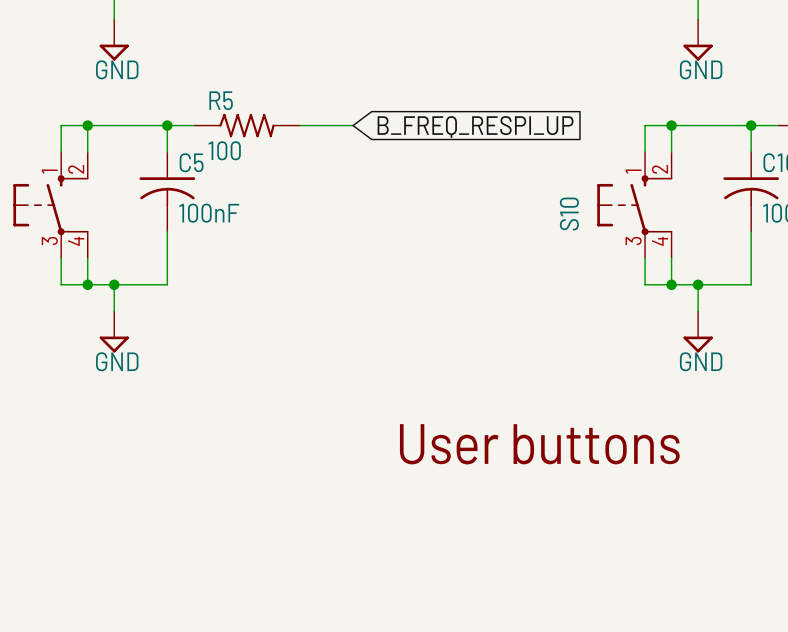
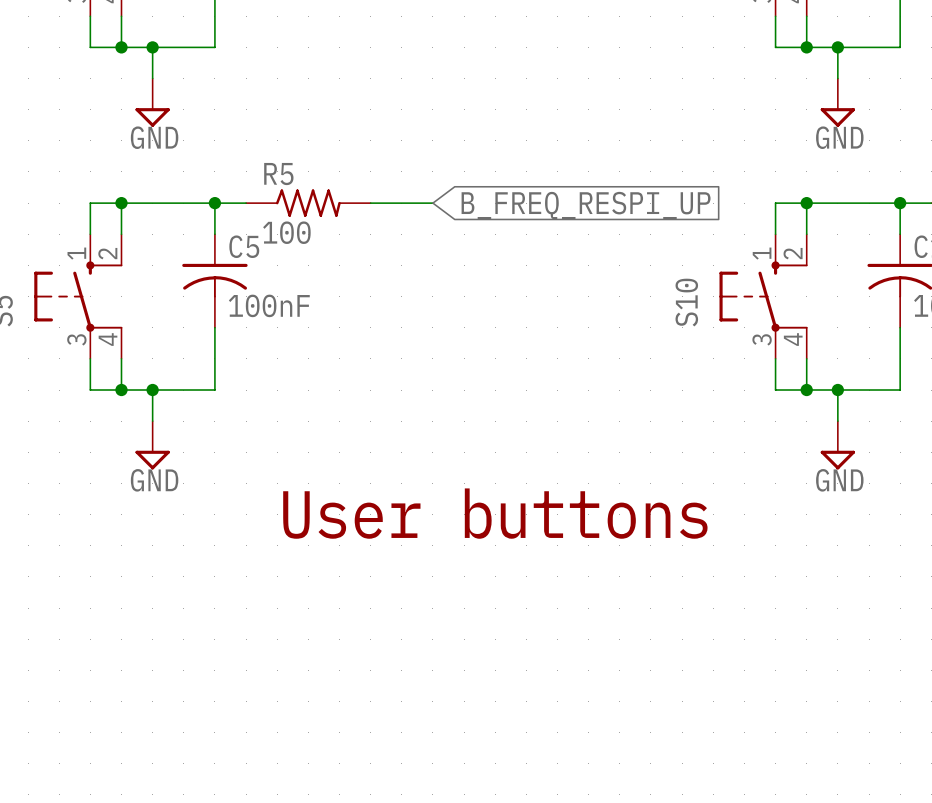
text position: User buttons (539, 444) -> User buttons (495, 513)

